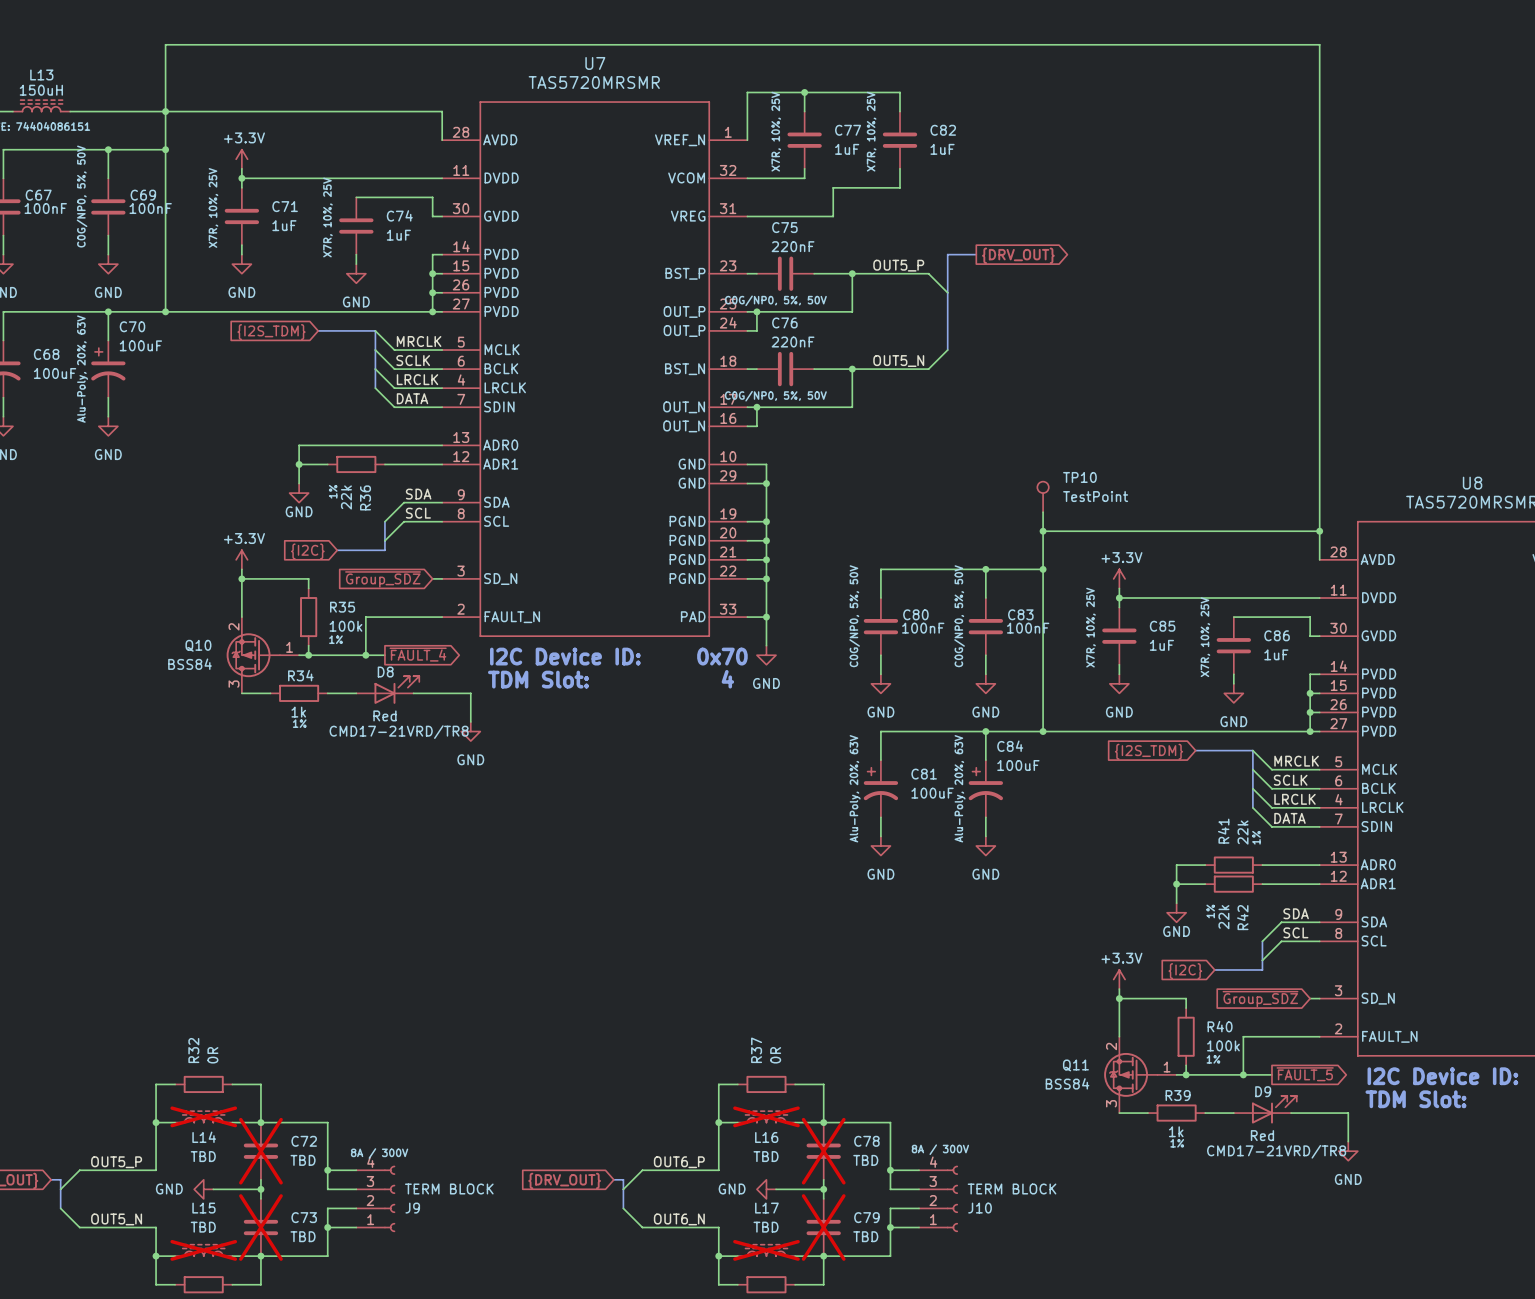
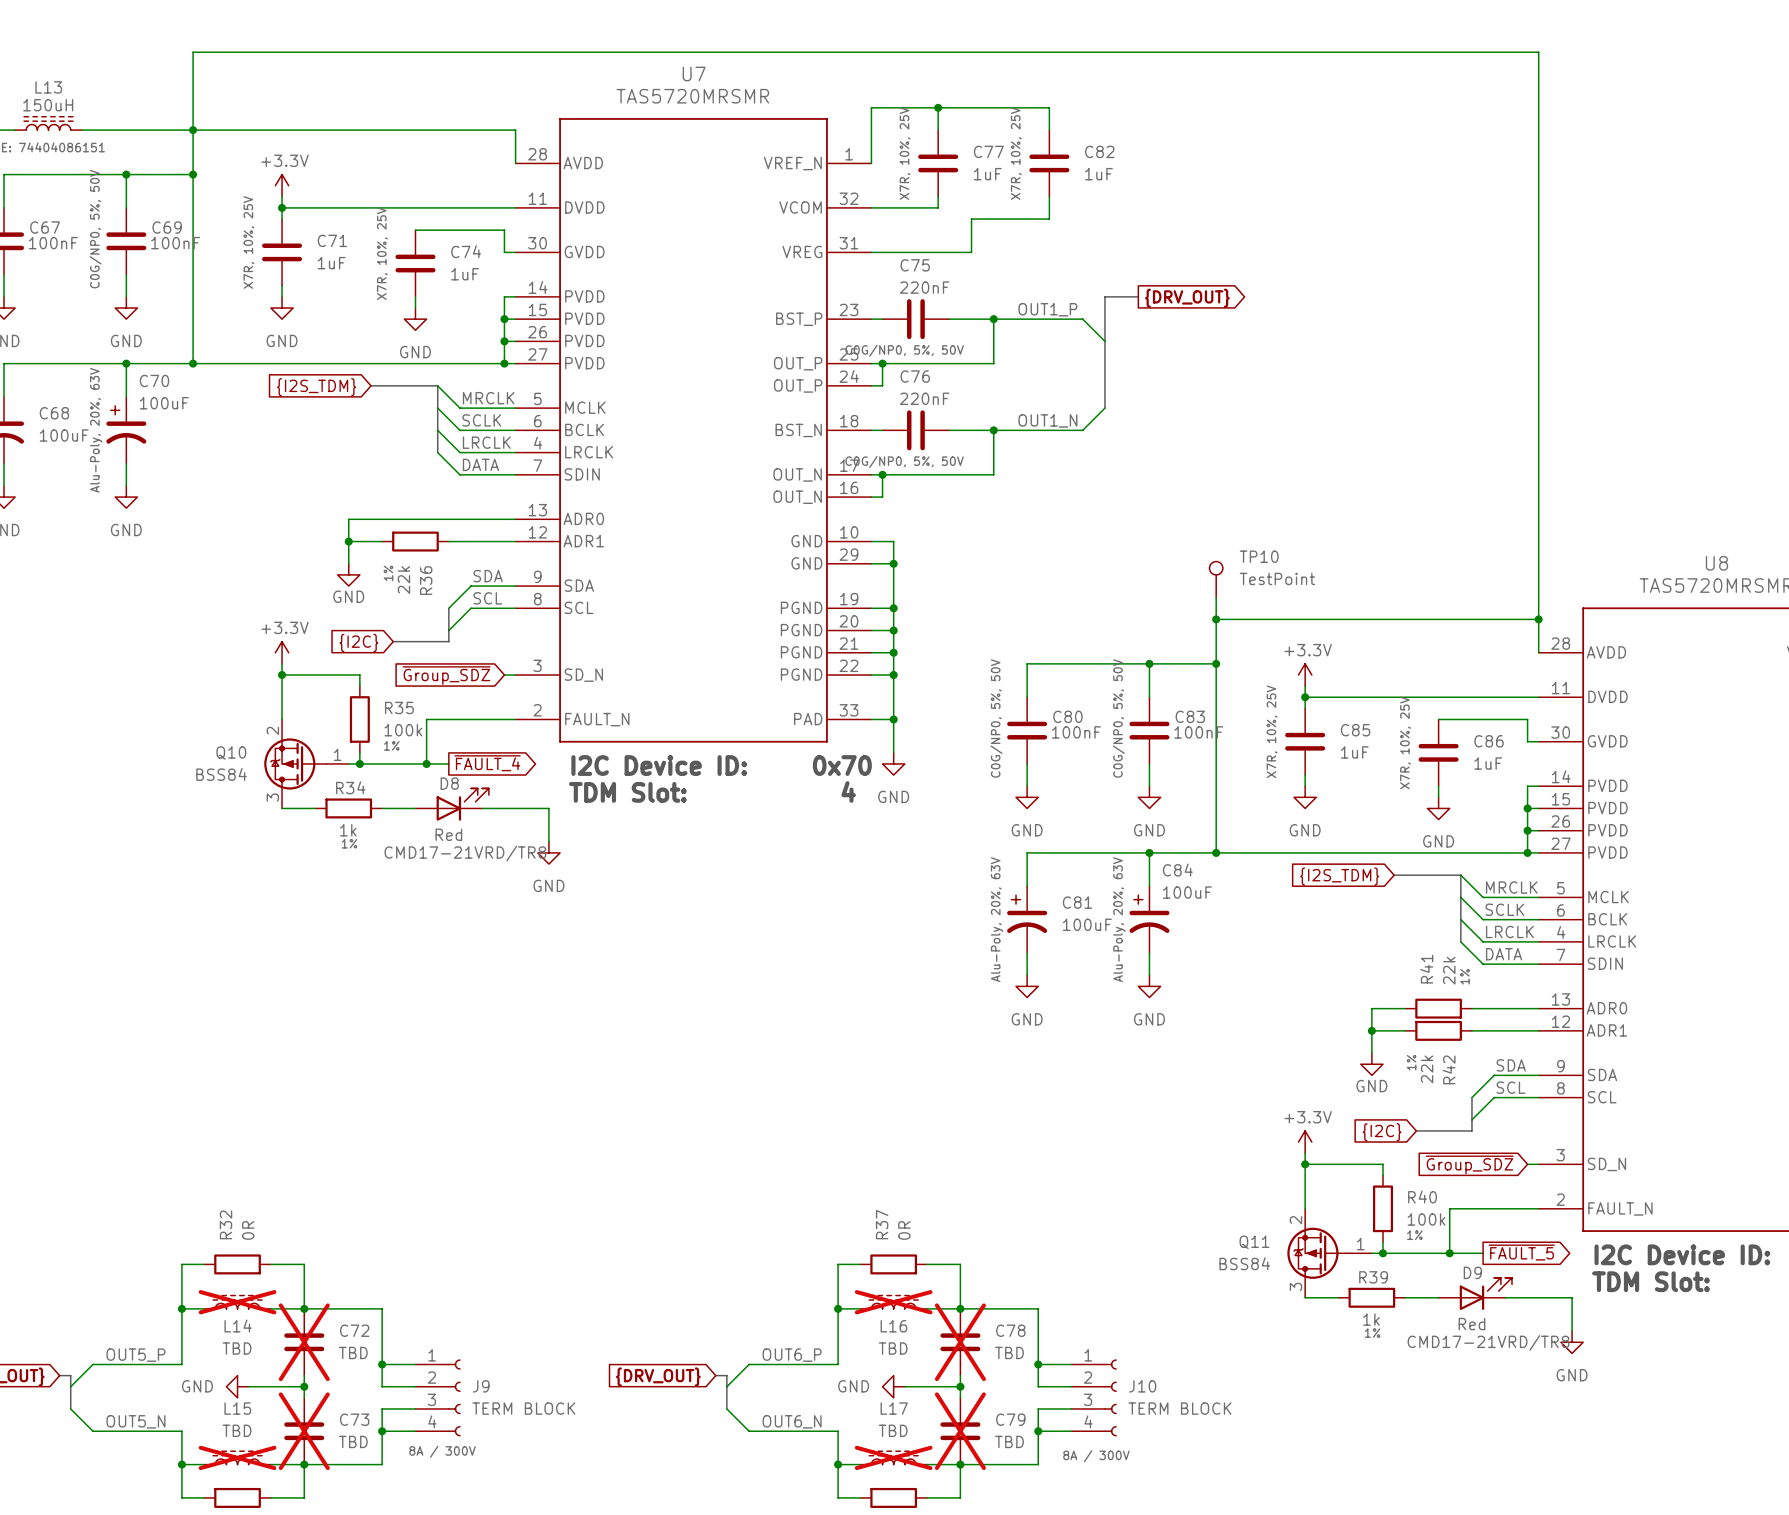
label: OUT5_P (898, 265) -> OUT1_P (1047, 309)
label: OUT5_N (898, 361) -> OUT1_N (1047, 420)
J9 flip: as is (389, 1198) -> up-down (454, 1397)
J10 flip: as is (952, 1198) -> up-down (1110, 1397)

